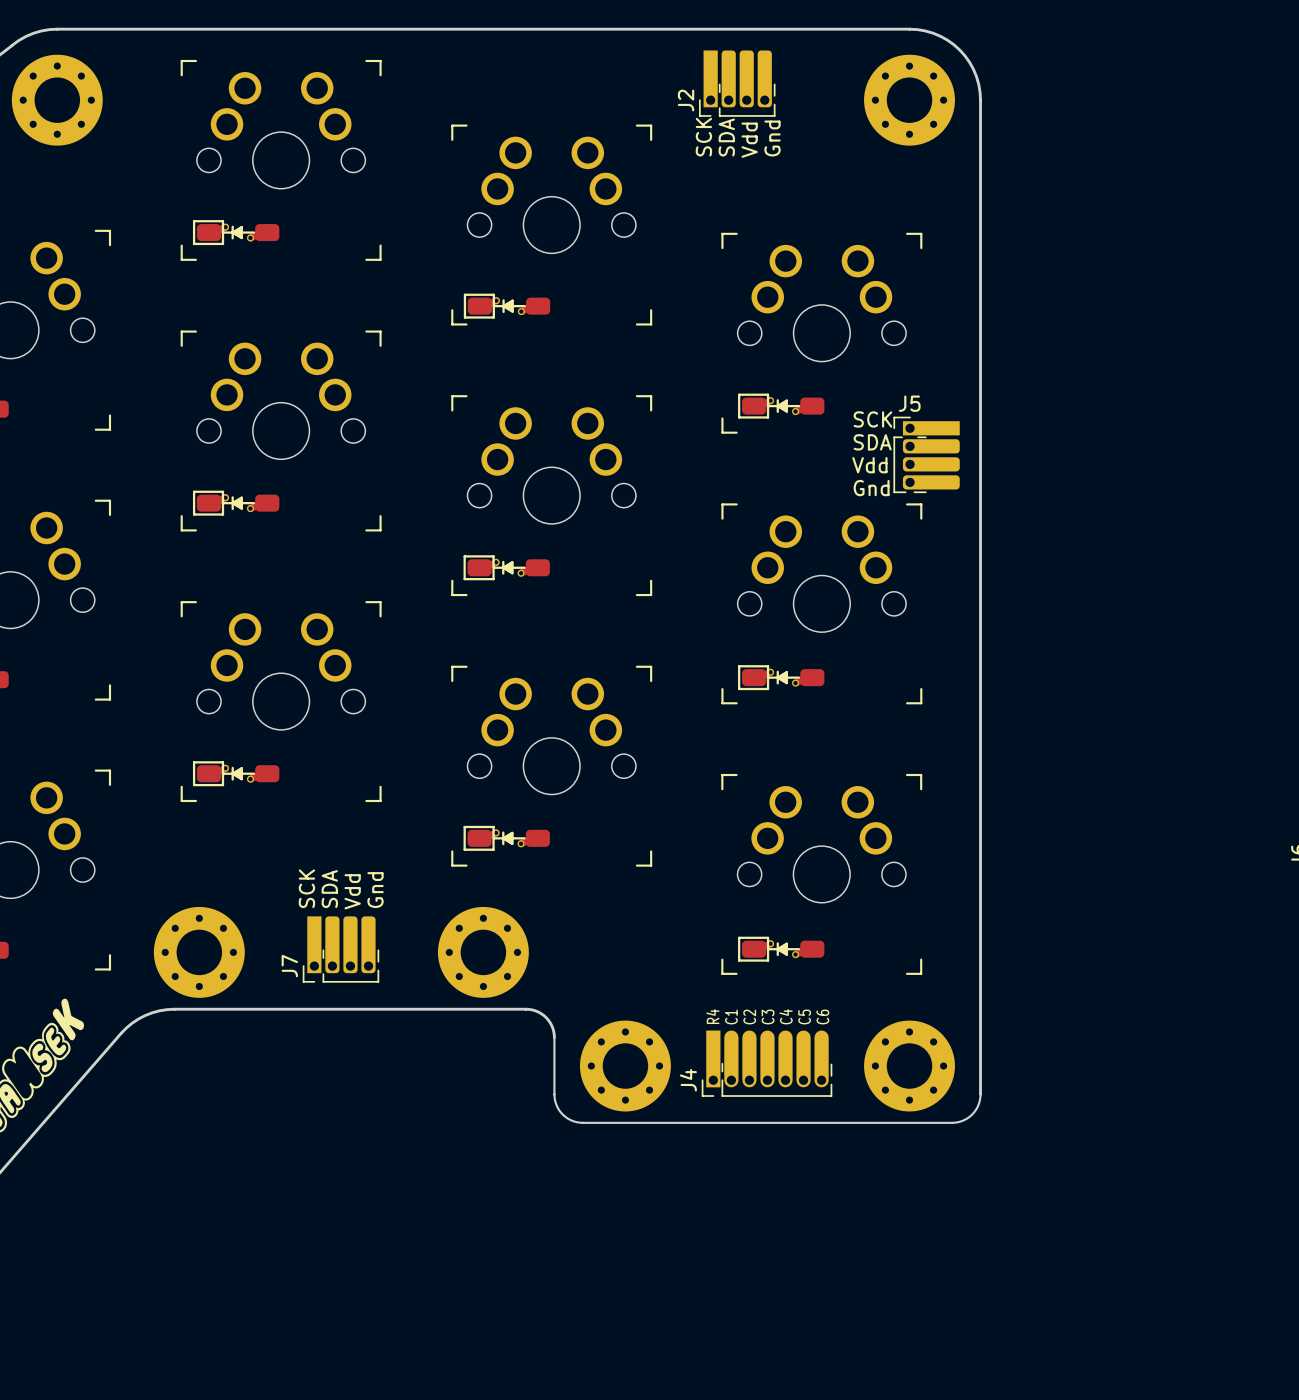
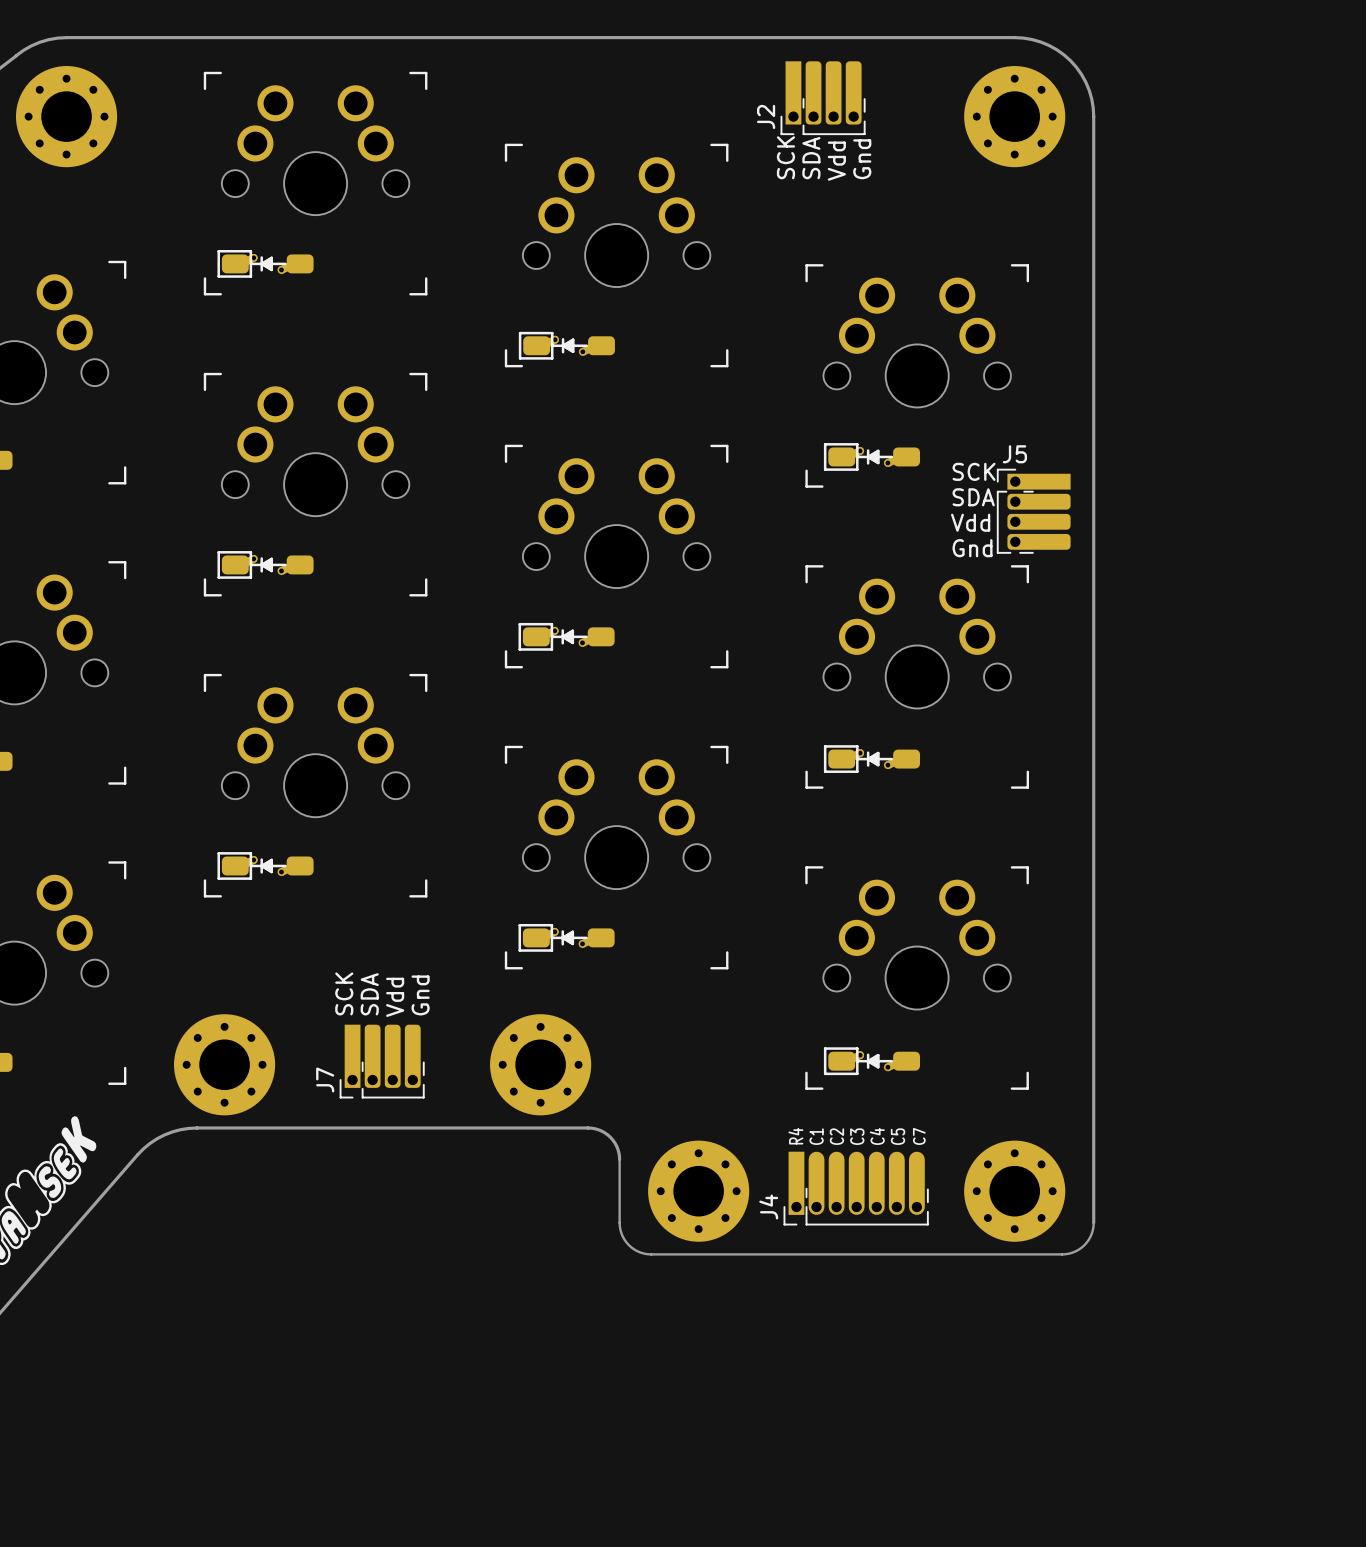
text: C6 (822, 1017) -> C7 (919, 1136)

